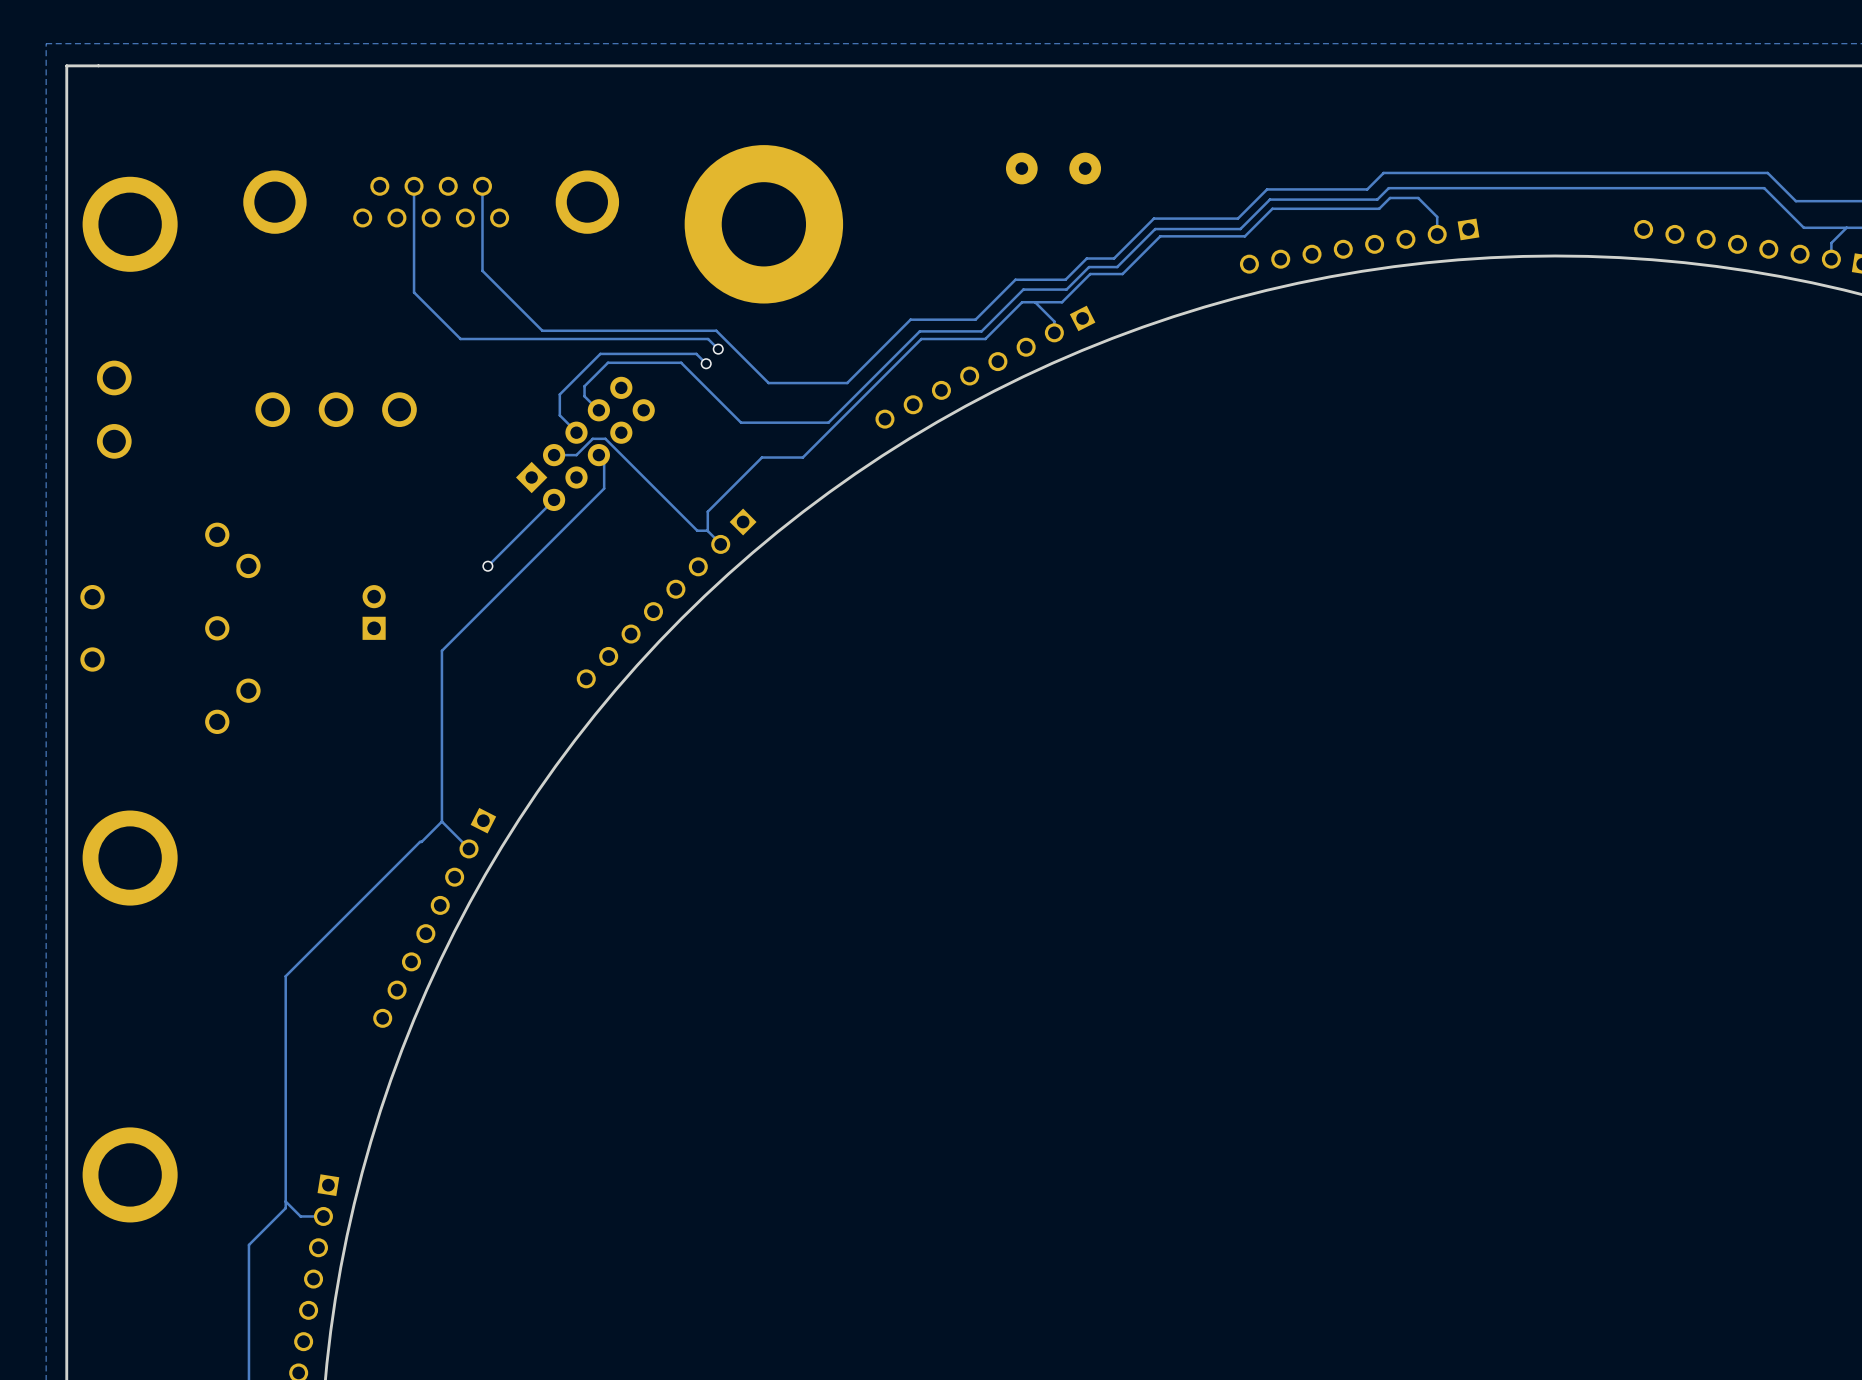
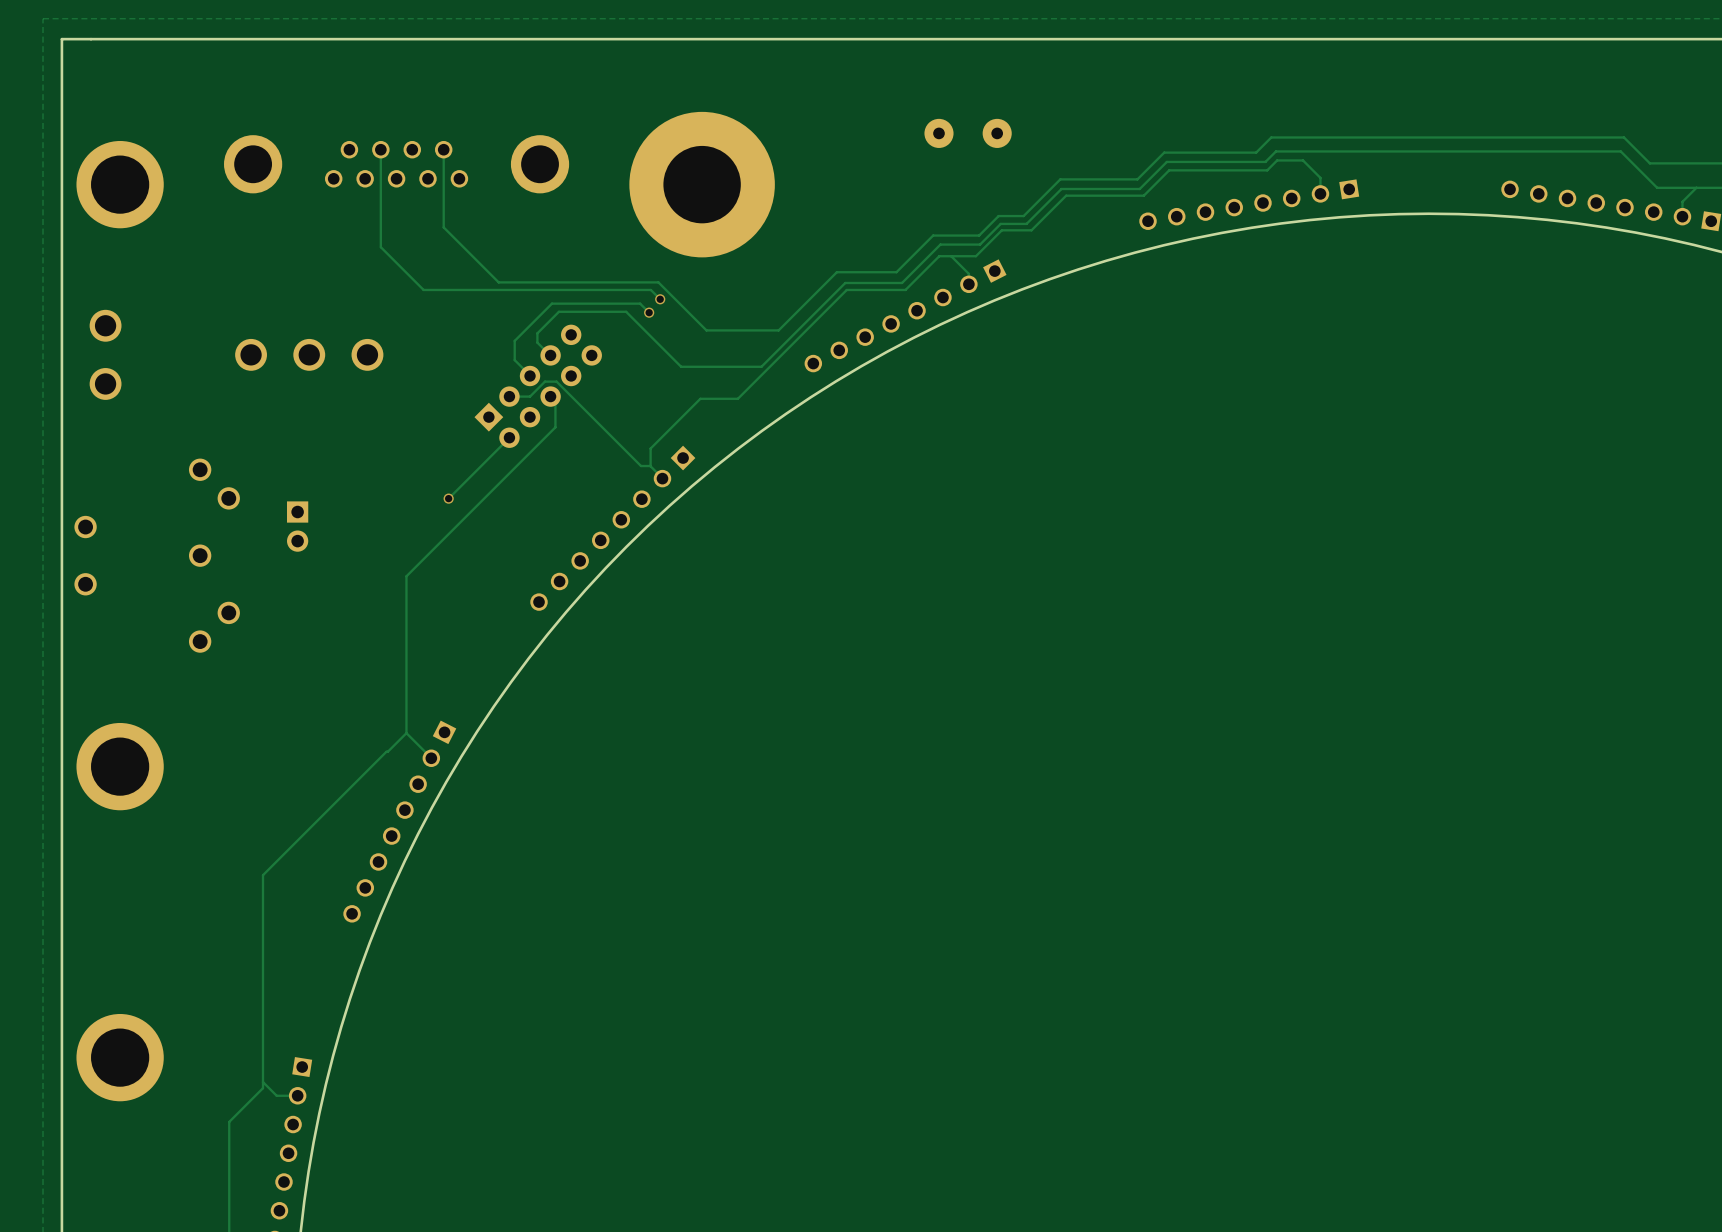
part rotation: 0° (374, 612) -> 180° (297, 526)
part position: (374, 612) -> (297, 526)

